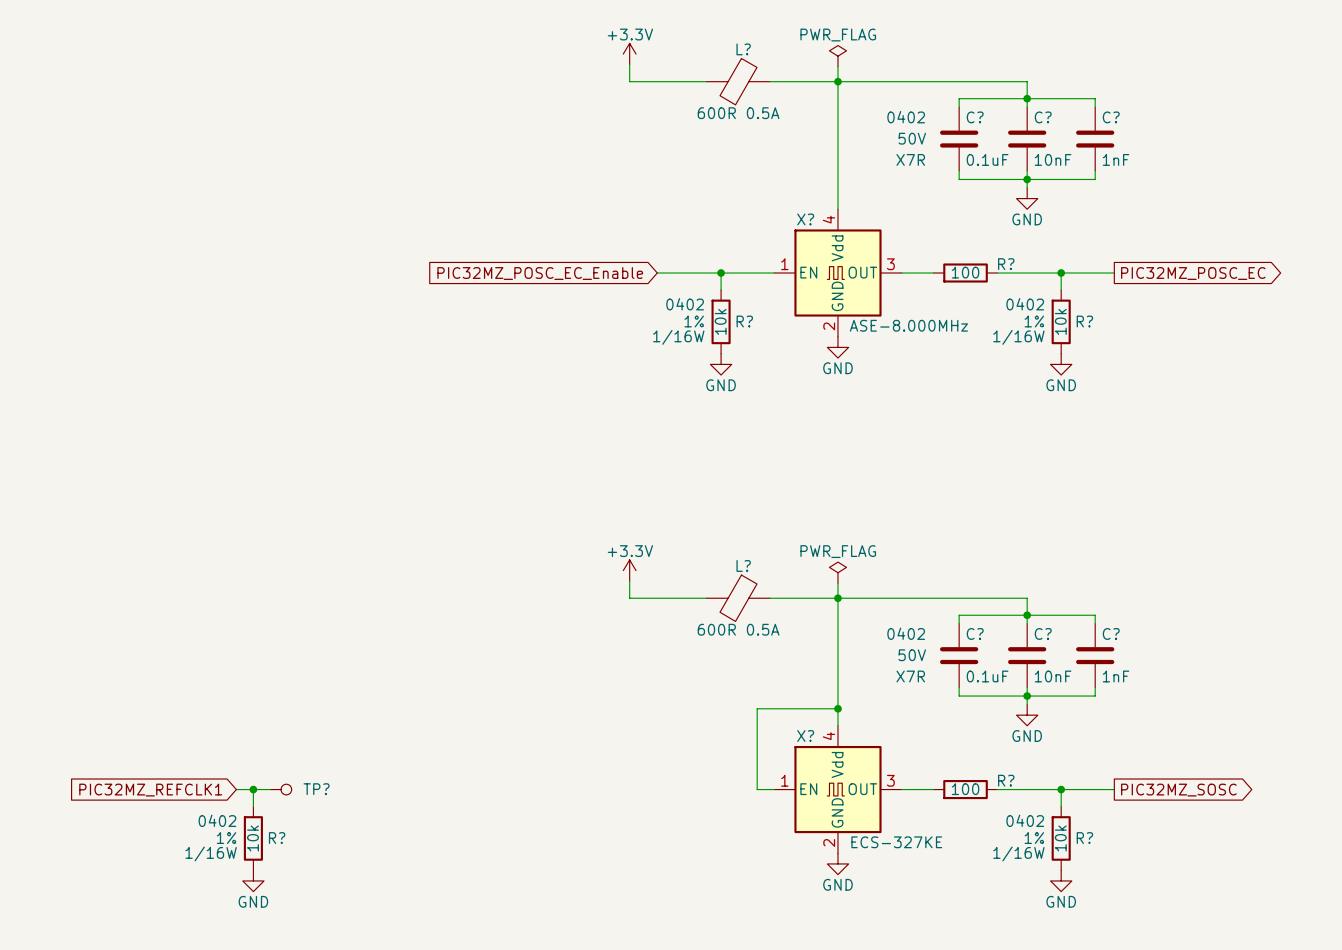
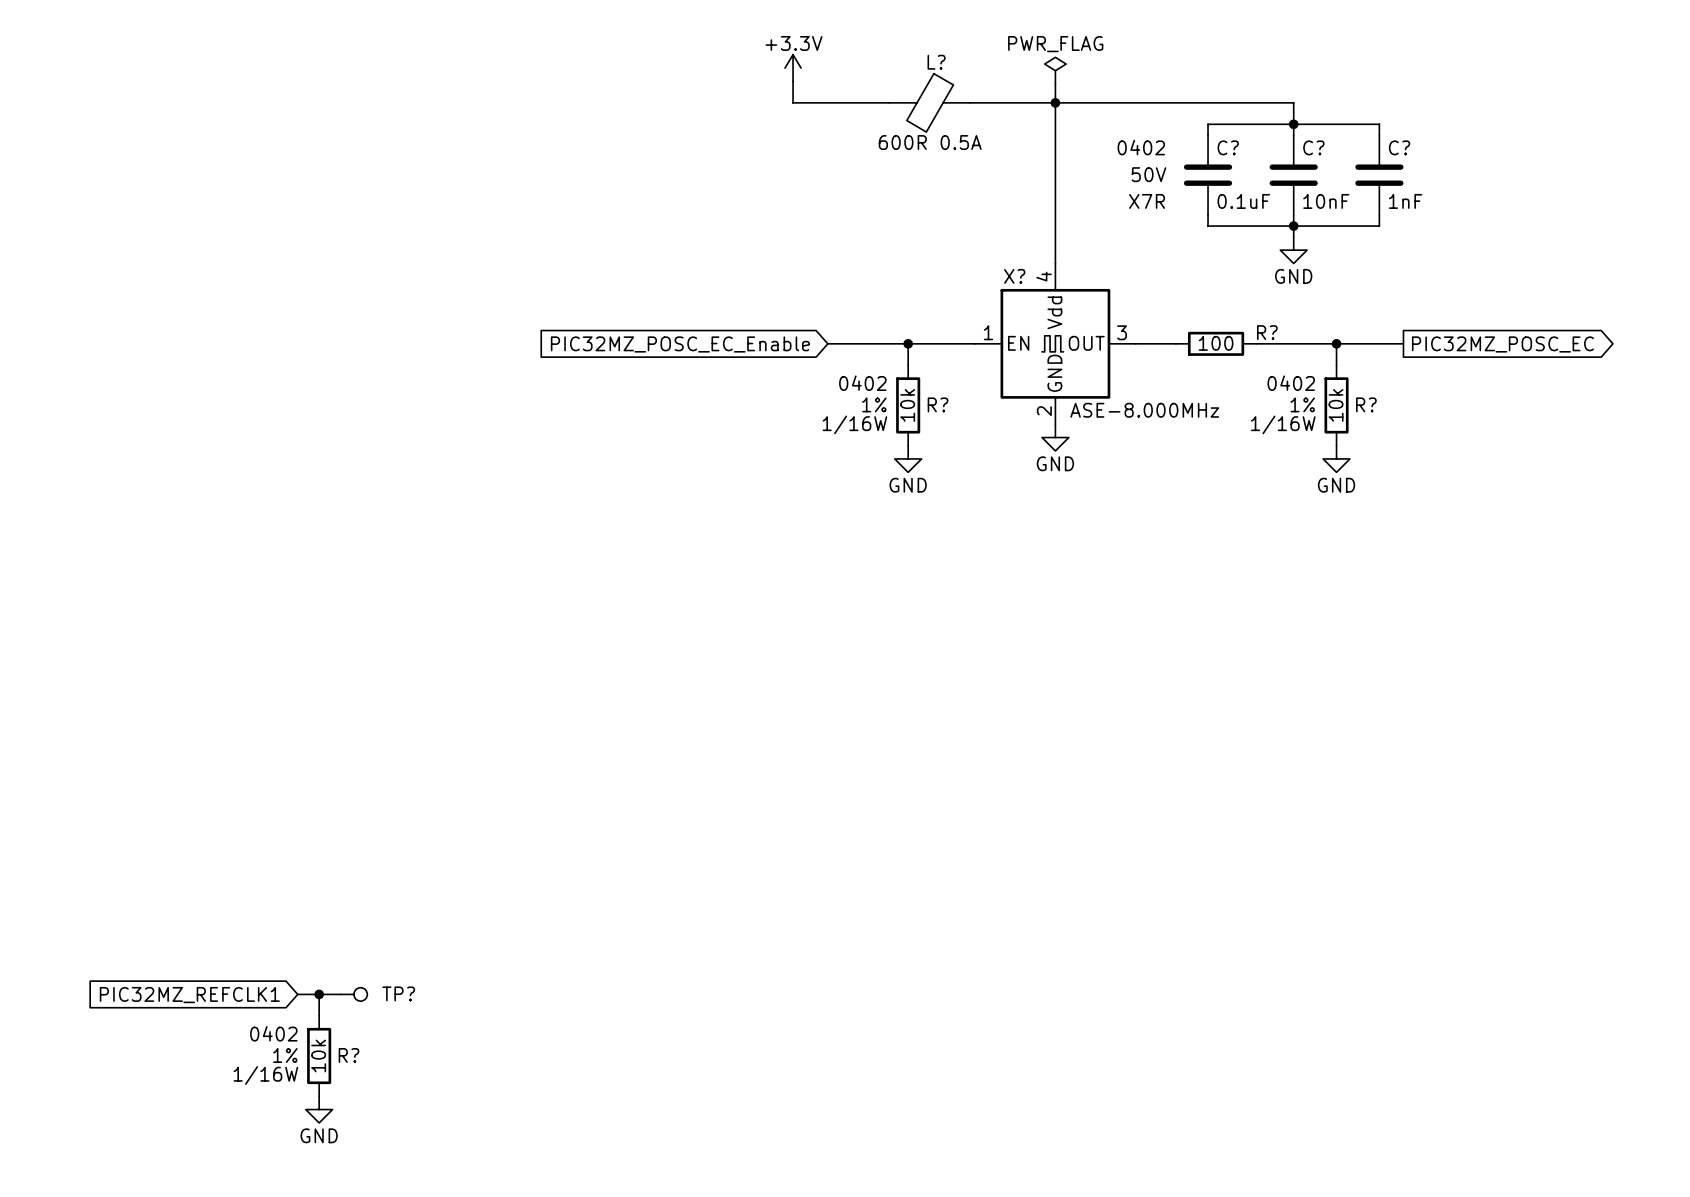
power symbol: +3.3V (629, 570) -> none
power symbol: PWR_FLAG (837, 572) -> none
wire: (629, 581) (629, 598) (706, 598) -> none
wire: (837, 583) (837, 725) -> none
L?: 600R 0.5A (738, 598) -> none
wire: (769, 598) (1027, 598) (1027, 623) -> none
junction: (837, 598) -> none
junction: (1027, 615) -> none
wire: (959, 623) (959, 615) (1095, 615) (1095, 623) -> none
C?: 0.1uF (959, 655) -> none
C?: 10nF (1027, 655) -> none
C?: 1nF (1095, 655) -> none
wire: (959, 687) (959, 696) (1095, 696) (1095, 687) -> none
wire: (1027, 687) (1027, 704) -> none
junction: (1027, 696) -> none
wire: (837, 708) (757, 708) (757, 789) (774, 789) -> none
junction: (837, 708) -> none
power symbol: GND (1027, 715) -> none
X?: ECS-327KE (837, 789) -> none
wire: (901, 789) (933, 789) -> none
R?: 100 (965, 789) -> none
wire: (997, 789) (1114, 789) -> none
wire: (1061, 789) (1061, 806) -> none
junction: (1061, 789) -> none
global label: PIC32MZ_SOSC (1178, 790) -> none
R?: 10k (1061, 838) -> none
power symbol: GND (837, 863) -> none
power symbol: GND (1061, 880) -> none

